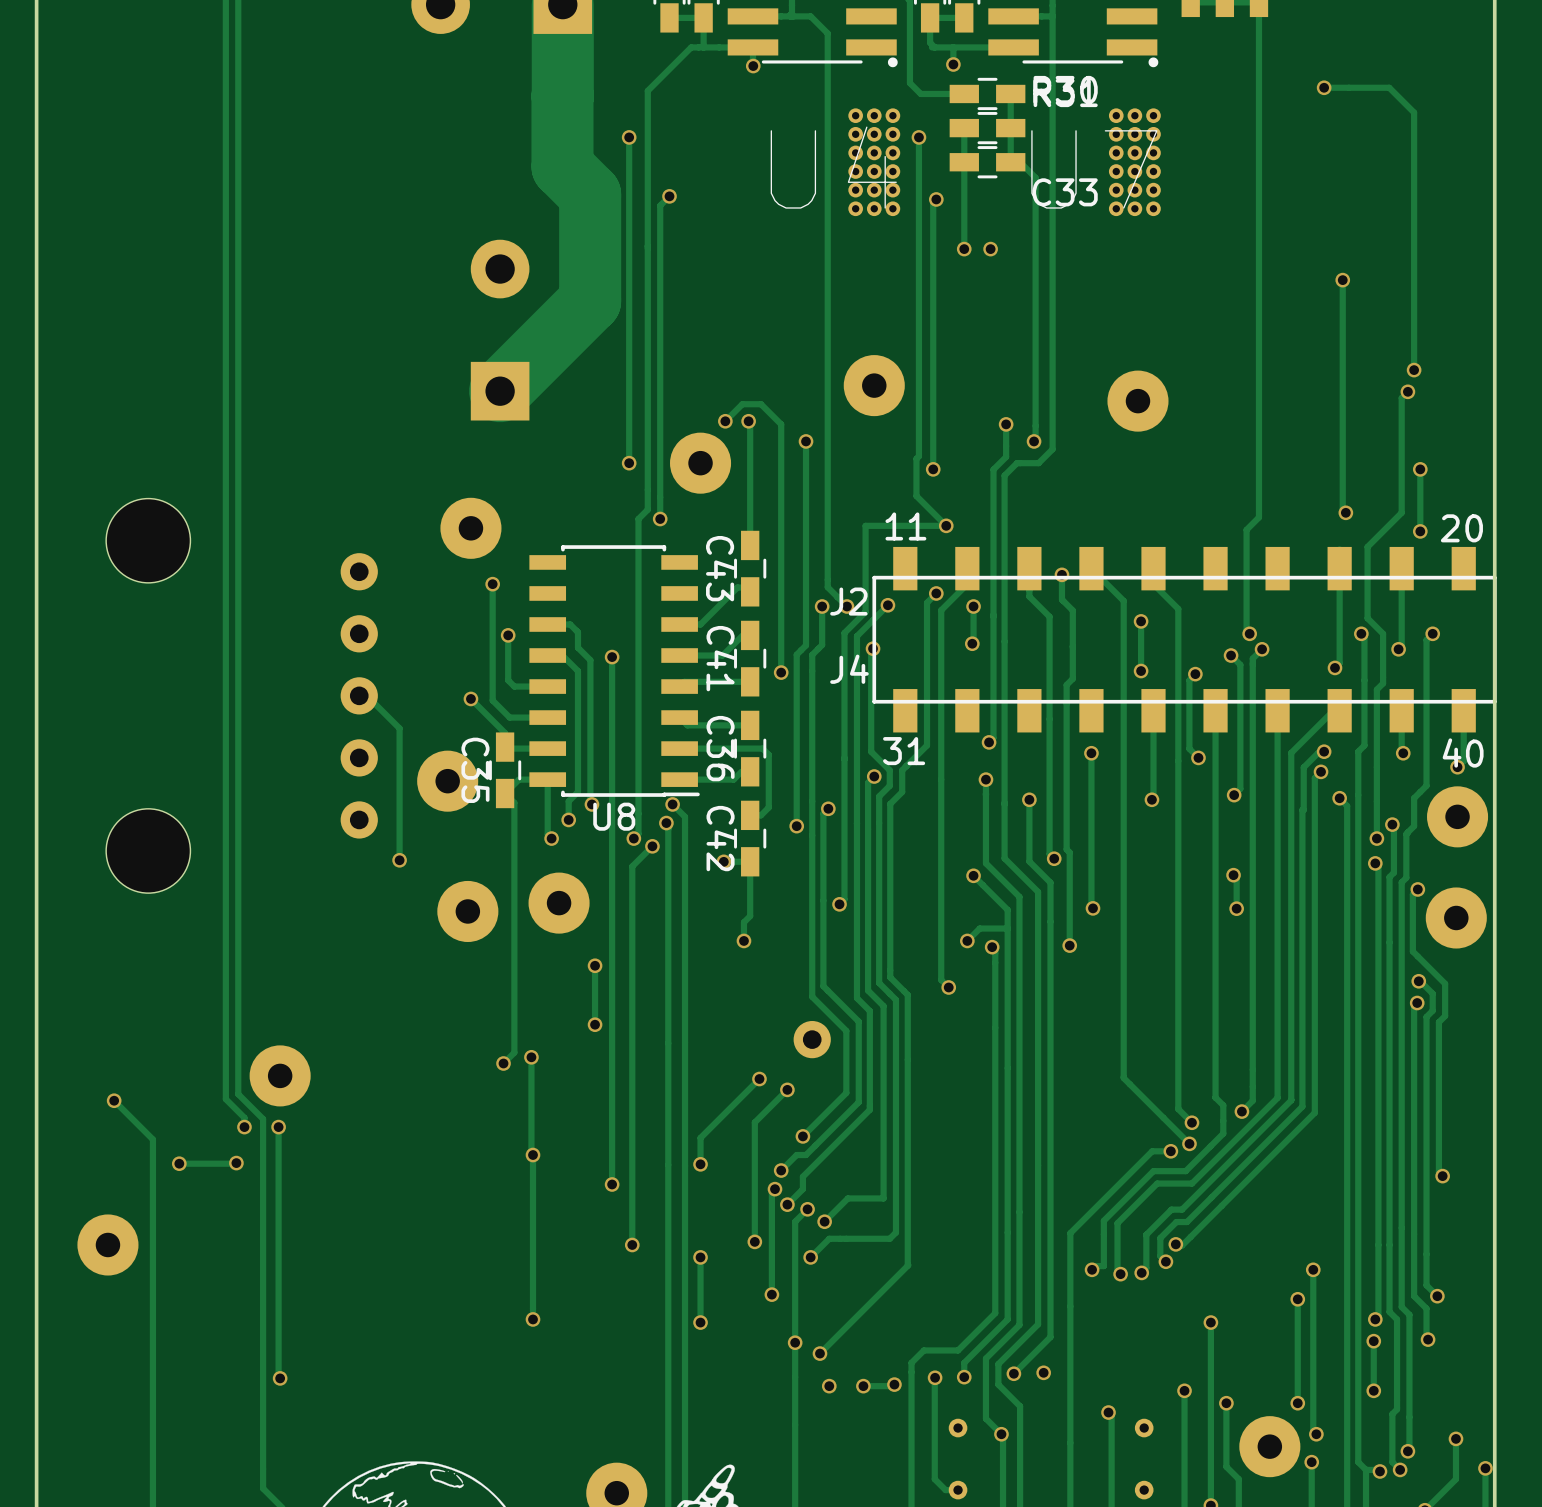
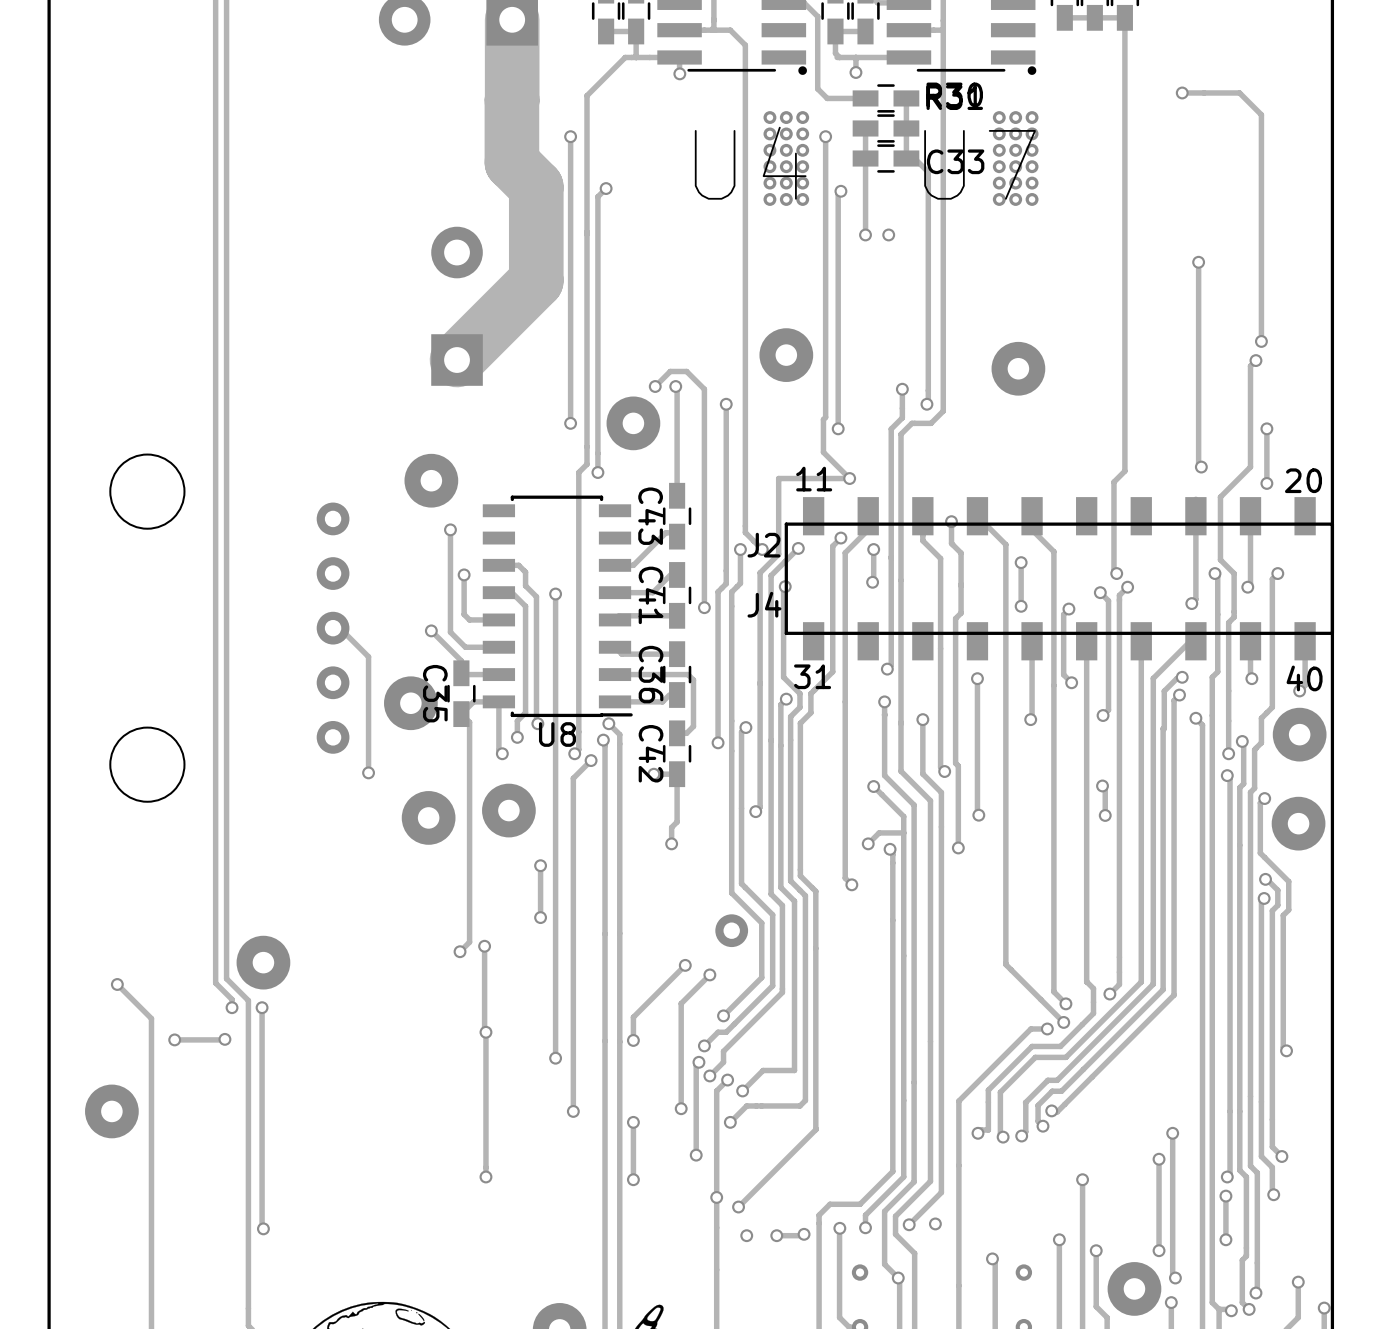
C33 name position: C33 (1065, 192) -> C33 (955, 161)

